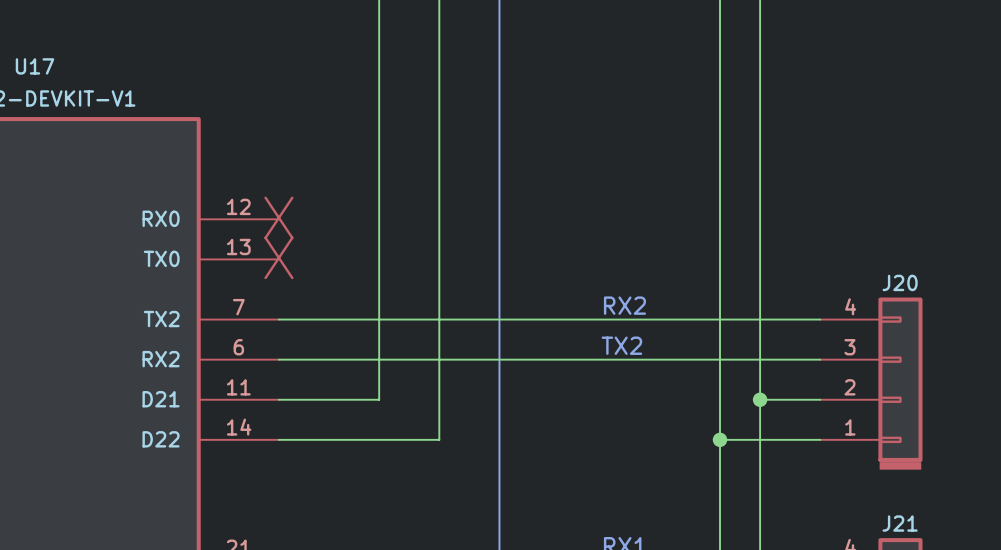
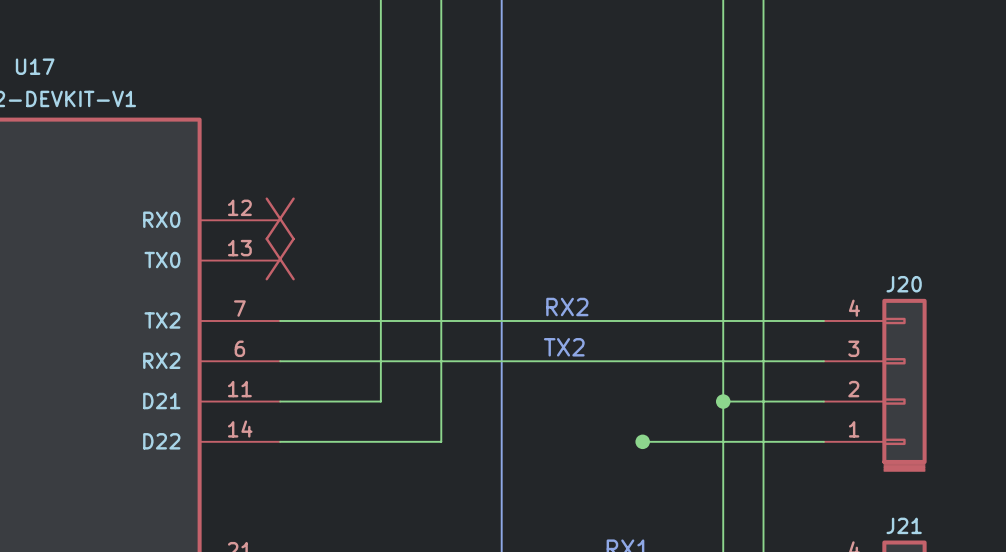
text position: RX2 (624, 305) -> RX2 (567, 307)
text position: TX2 (621, 345) -> TX2 (564, 347)
wire: none -> (723, 401) (763, 401)
junction: none -> (723, 401)
junction: (760, 399) -> none
wire: none -> (642, 441) (723, 441)
junction: none -> (642, 441)
junction: (720, 439) -> none

